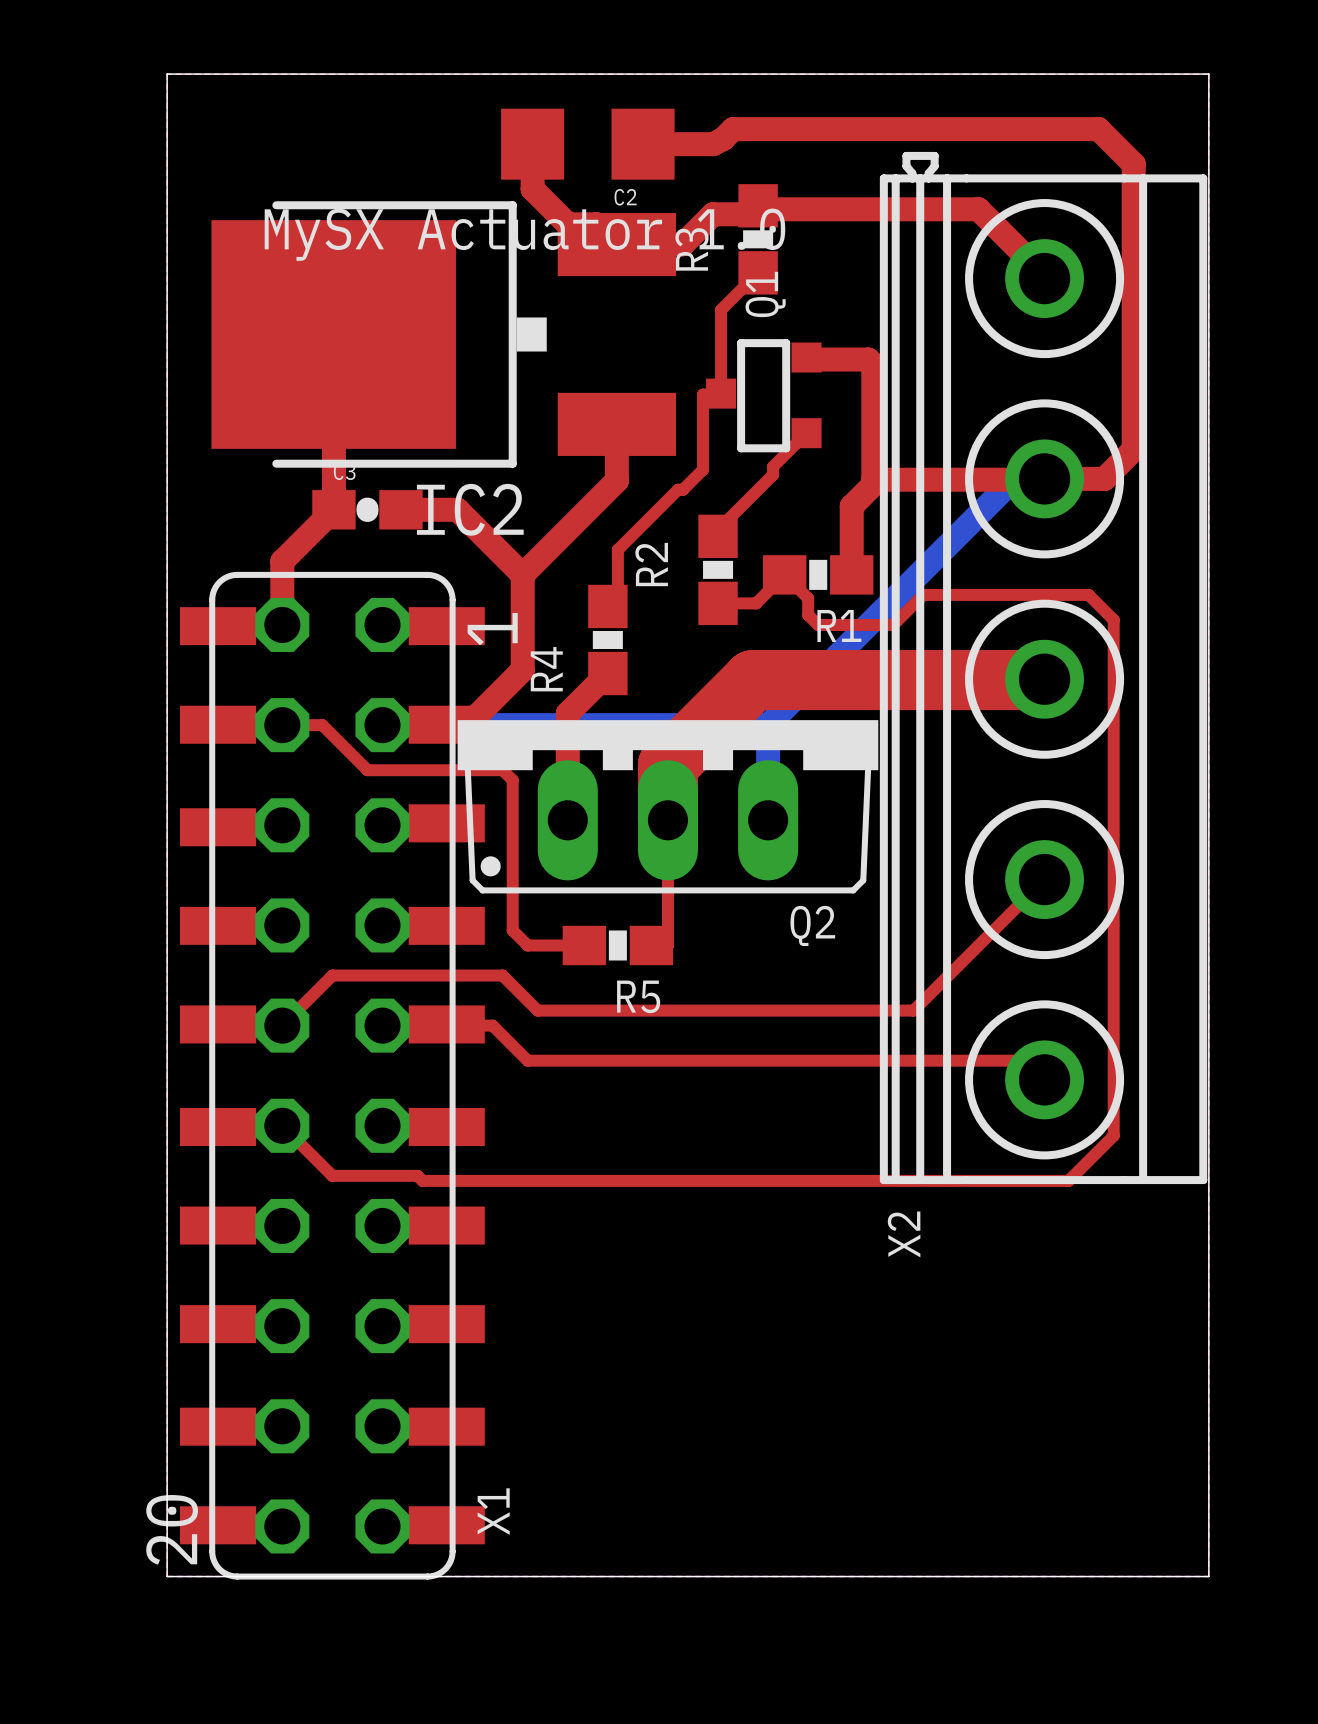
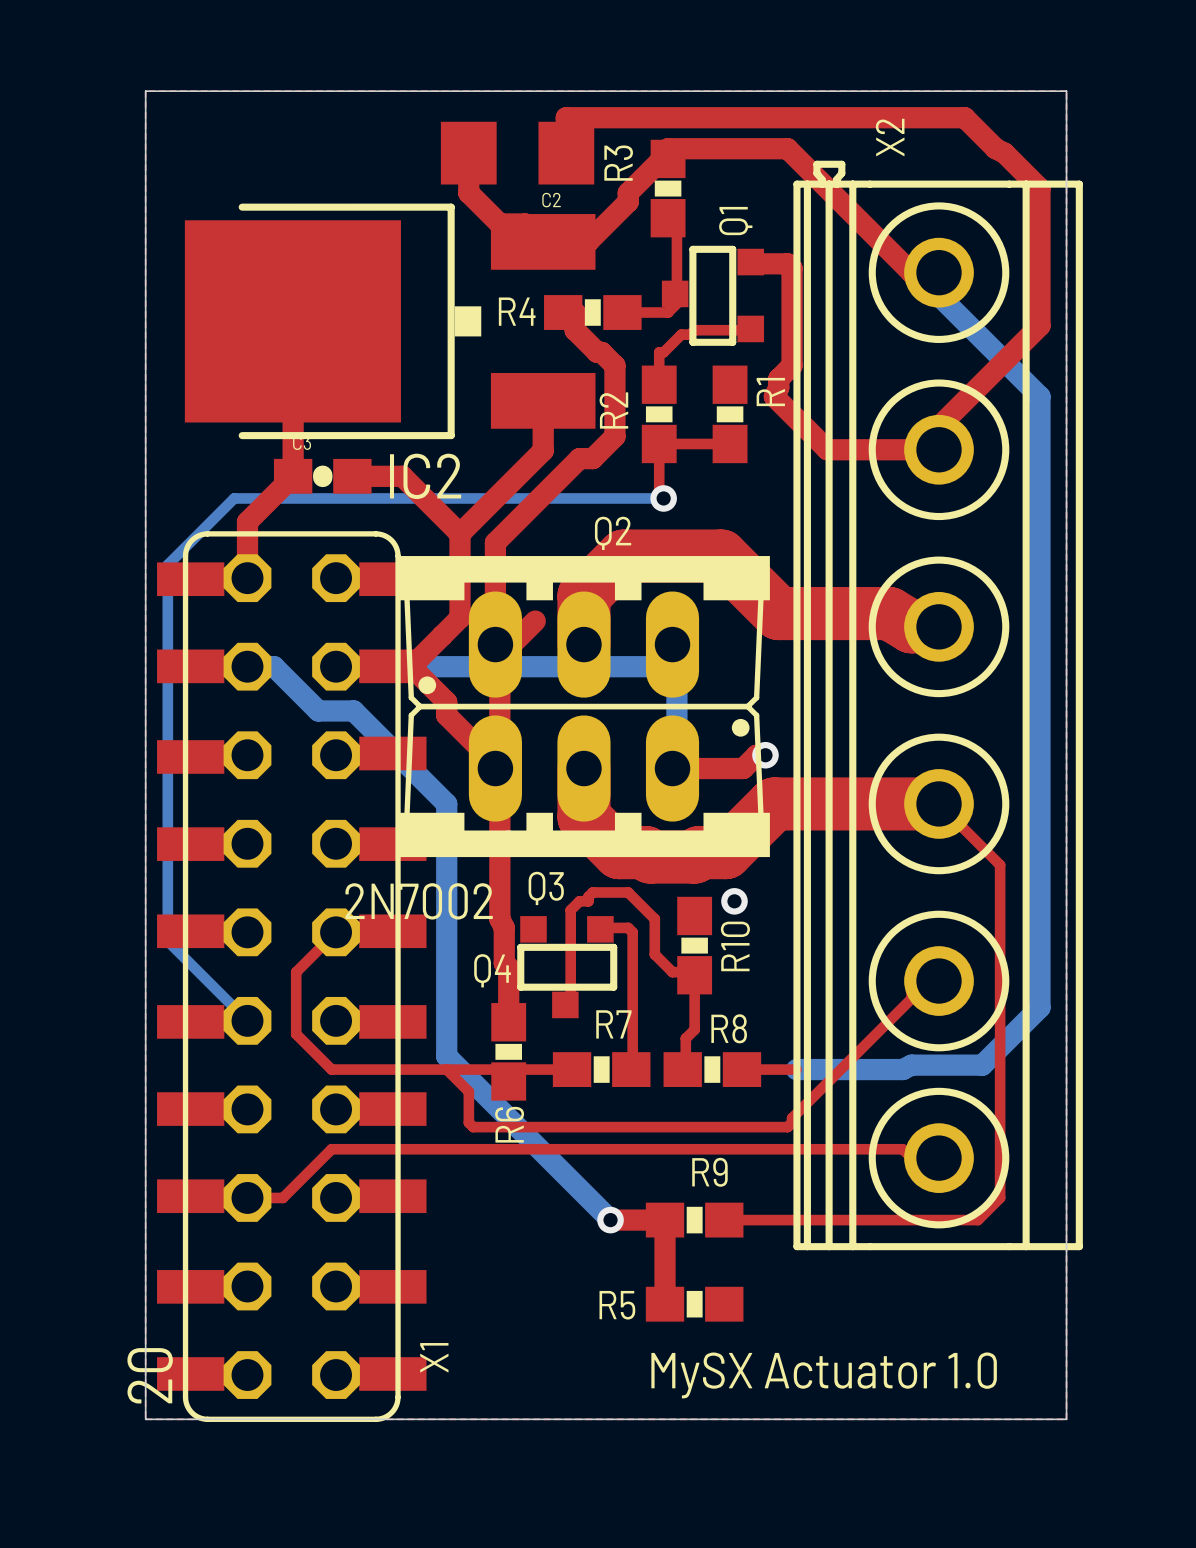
top track: (643, 144) (713, 144) (723, 139) (733, 129) (1098, 129) (1133, 164) (1133, 449) (1104, 478) (1043, 479) -> (566, 153) (566, 117) (964, 117) (995, 148) (1004, 153) (1039, 188) (1039, 325) (939, 426) (939, 449) (920, 449)
X2 footprint: [879, 151, 1208, 1185] -> [793, 160, 1083, 1251]
top track: none -> (668, 218) (676, 227) (676, 290)
text: MySX Actuator 1.0 (524, 234) -> none
R3 position: (758, 239) -> (668, 188)
top track: (667, 244) (682, 244) (713, 214) (748, 214) (758, 205) (758, 209) (978, 209) (1043, 274) (1044, 278) -> (588, 241) (628, 201) (628, 192) (659, 162) (668, 158) (668, 148) (787, 148) (911, 272) (939, 272)
R3 name position: R3 (692, 249) -> R3 (618, 163)
top track: (758, 272) (721, 309) (721, 393) (703, 394) (703, 469) (682, 489) (677, 489) (617, 549) (617, 596) (607, 606) -> none
bottom track: none -> (939, 272) (939, 295) (1039, 396) (1039, 1007) (982, 1065) (911, 1065) (902, 1069) (796, 1069)
Q1 name position: Q1 (765, 294) -> Q1 (735, 221)
top track: none -> (676, 290) (681, 294) (681, 299) (668, 312) (622, 312)
top track: none -> (563, 312) (575, 312) (575, 330) (597, 352) (601, 352) (614, 365) (614, 436) (592, 458) (579, 458) (495, 542) (495, 644)
top track: none -> (750, 328) (694, 330) (690, 334) (681, 334) (663, 352) (659, 352) (659, 384)
top track: (806, 357) (808, 359) (868, 359) (873, 364) (873, 479) (938, 479) -> (750, 262) (752, 263) (787, 263) (792, 268) (792, 365) (778, 378) (778, 387) (774, 396) (827, 449)
Q1 position: (763, 395) -> (712, 295)
top track: (806, 433) (773, 466) (773, 474) (718, 529) (718, 536) -> none
top track: none -> (730, 443) (659, 443) (659, 494) (663, 498)
bottom track: (1044, 478) (1014, 478) (768, 725) -> none
top track: (878, 479) (851, 506) (851, 574) -> none
bottom track: none -> (663, 498) (234, 498) (167, 564) (167, 941) (247, 1020)
via: none -> (663, 498)
R2 name position: R2 (651, 564) -> R2 (613, 410)
R2 position: (718, 569) -> (659, 414)
R1 rotation: 0° (818, 574) -> 90° clockwise (730, 414)
R1 position: (818, 574) -> (730, 414)
top track: (718, 603) (756, 603) (784, 574) (808, 598) (808, 614) (818, 624) (893, 624) (923, 594) (1088, 594) (1113, 619) (1113, 1135) (1068, 1180) (903, 1180) -> none
R4 rotation: 0° (607, 639) -> 90° clockwise (592, 312)
R4 position: (607, 639) -> (592, 312)
top track: (1033, 680) (753, 680) (667, 765) (667, 945) (651, 945) -> (911, 626) (889, 613) (778, 613) (721, 556) (623, 556) (583, 595) (583, 644)
top track: (282, 725) (322, 725) (367, 770) (502, 770) (512, 780) (512, 930) (527, 945) (584, 945) -> none
bottom track: none -> (247, 666) (274, 666) (318, 710) (353, 710) (446, 803) (446, 1056) (610, 1220)
top track: none -> (411, 666) (446, 702) (446, 715) (491, 759) (499, 772) (499, 919) (504, 927) (504, 963) (508, 967) (508, 1022)
Q2 position: (667, 806) -> (583, 632)
top track: none -> (765, 755) (756, 755) (743, 768) (672, 768)
via: none -> (765, 755)
top track: none -> (583, 768) (583, 817) (619, 852) (645, 852) (650, 857) (694, 857) (699, 852) (725, 852) (774, 803) (939, 803) (1000, 865) (1000, 1197) (977, 1220) (724, 1220)
Q3: none -> (583, 780)
top track: (1044, 879) (913, 1010) (537, 1010) (502, 975) (332, 975) (282, 1025) -> none
Q2 name position: Q2 (812, 925) -> Q2 (613, 533)
R5 position: (617, 945) -> (694, 1304)
via: none -> (734, 901)
R5 name position: R5 (638, 996) -> R5 (617, 1305)
top track: (382, 1025) (492, 1025) (527, 1060) (1025, 1060) (1044, 1079) -> none
R10: none -> (694, 945)
Q4: none -> 2N7002 (567, 967)
top track: none -> (939, 981) (911, 981) (911, 998) (792, 1118) (792, 1122) (787, 1127) (473, 1127) (468, 1122) (468, 1091) (446, 1069)
top track: (282, 1125) (332, 1175) (417, 1175) (422, 1180) -> (336, 932) (296, 972) (296, 1034) (331, 1069) (371, 1069)
R6: none -> (508, 1051)
top track: (649, 1180) (716, 1180) -> (600, 929) (628, 927) (632, 932) (632, 1069)
R7: none -> (601, 1069)
top track: (718, 1180) (774, 1180) -> none
top track: (778, 1180) (841, 1180) -> (685, 1069) (685, 1038) (694, 1029) (694, 972) (672, 972) (654, 954) (654, 919) (628, 892) (592, 892) (588, 896) (588, 901) (579, 901) (570, 910) (570, 1003) (566, 1007) (565, 1004)
R8: none -> (712, 1069)
X2 name position: X2 (904, 1234) -> X2 (890, 137)
top track: none -> (939, 1158) (911, 1158) (902, 1149) (331, 1149) (282, 1197) (247, 1197)
top track: none -> (610, 1220) (665, 1220) (665, 1304)
via: none -> (610, 1220)
R9: none -> (694, 1220)
text: none -> MySX Actuator 1.0 (824, 1375)

